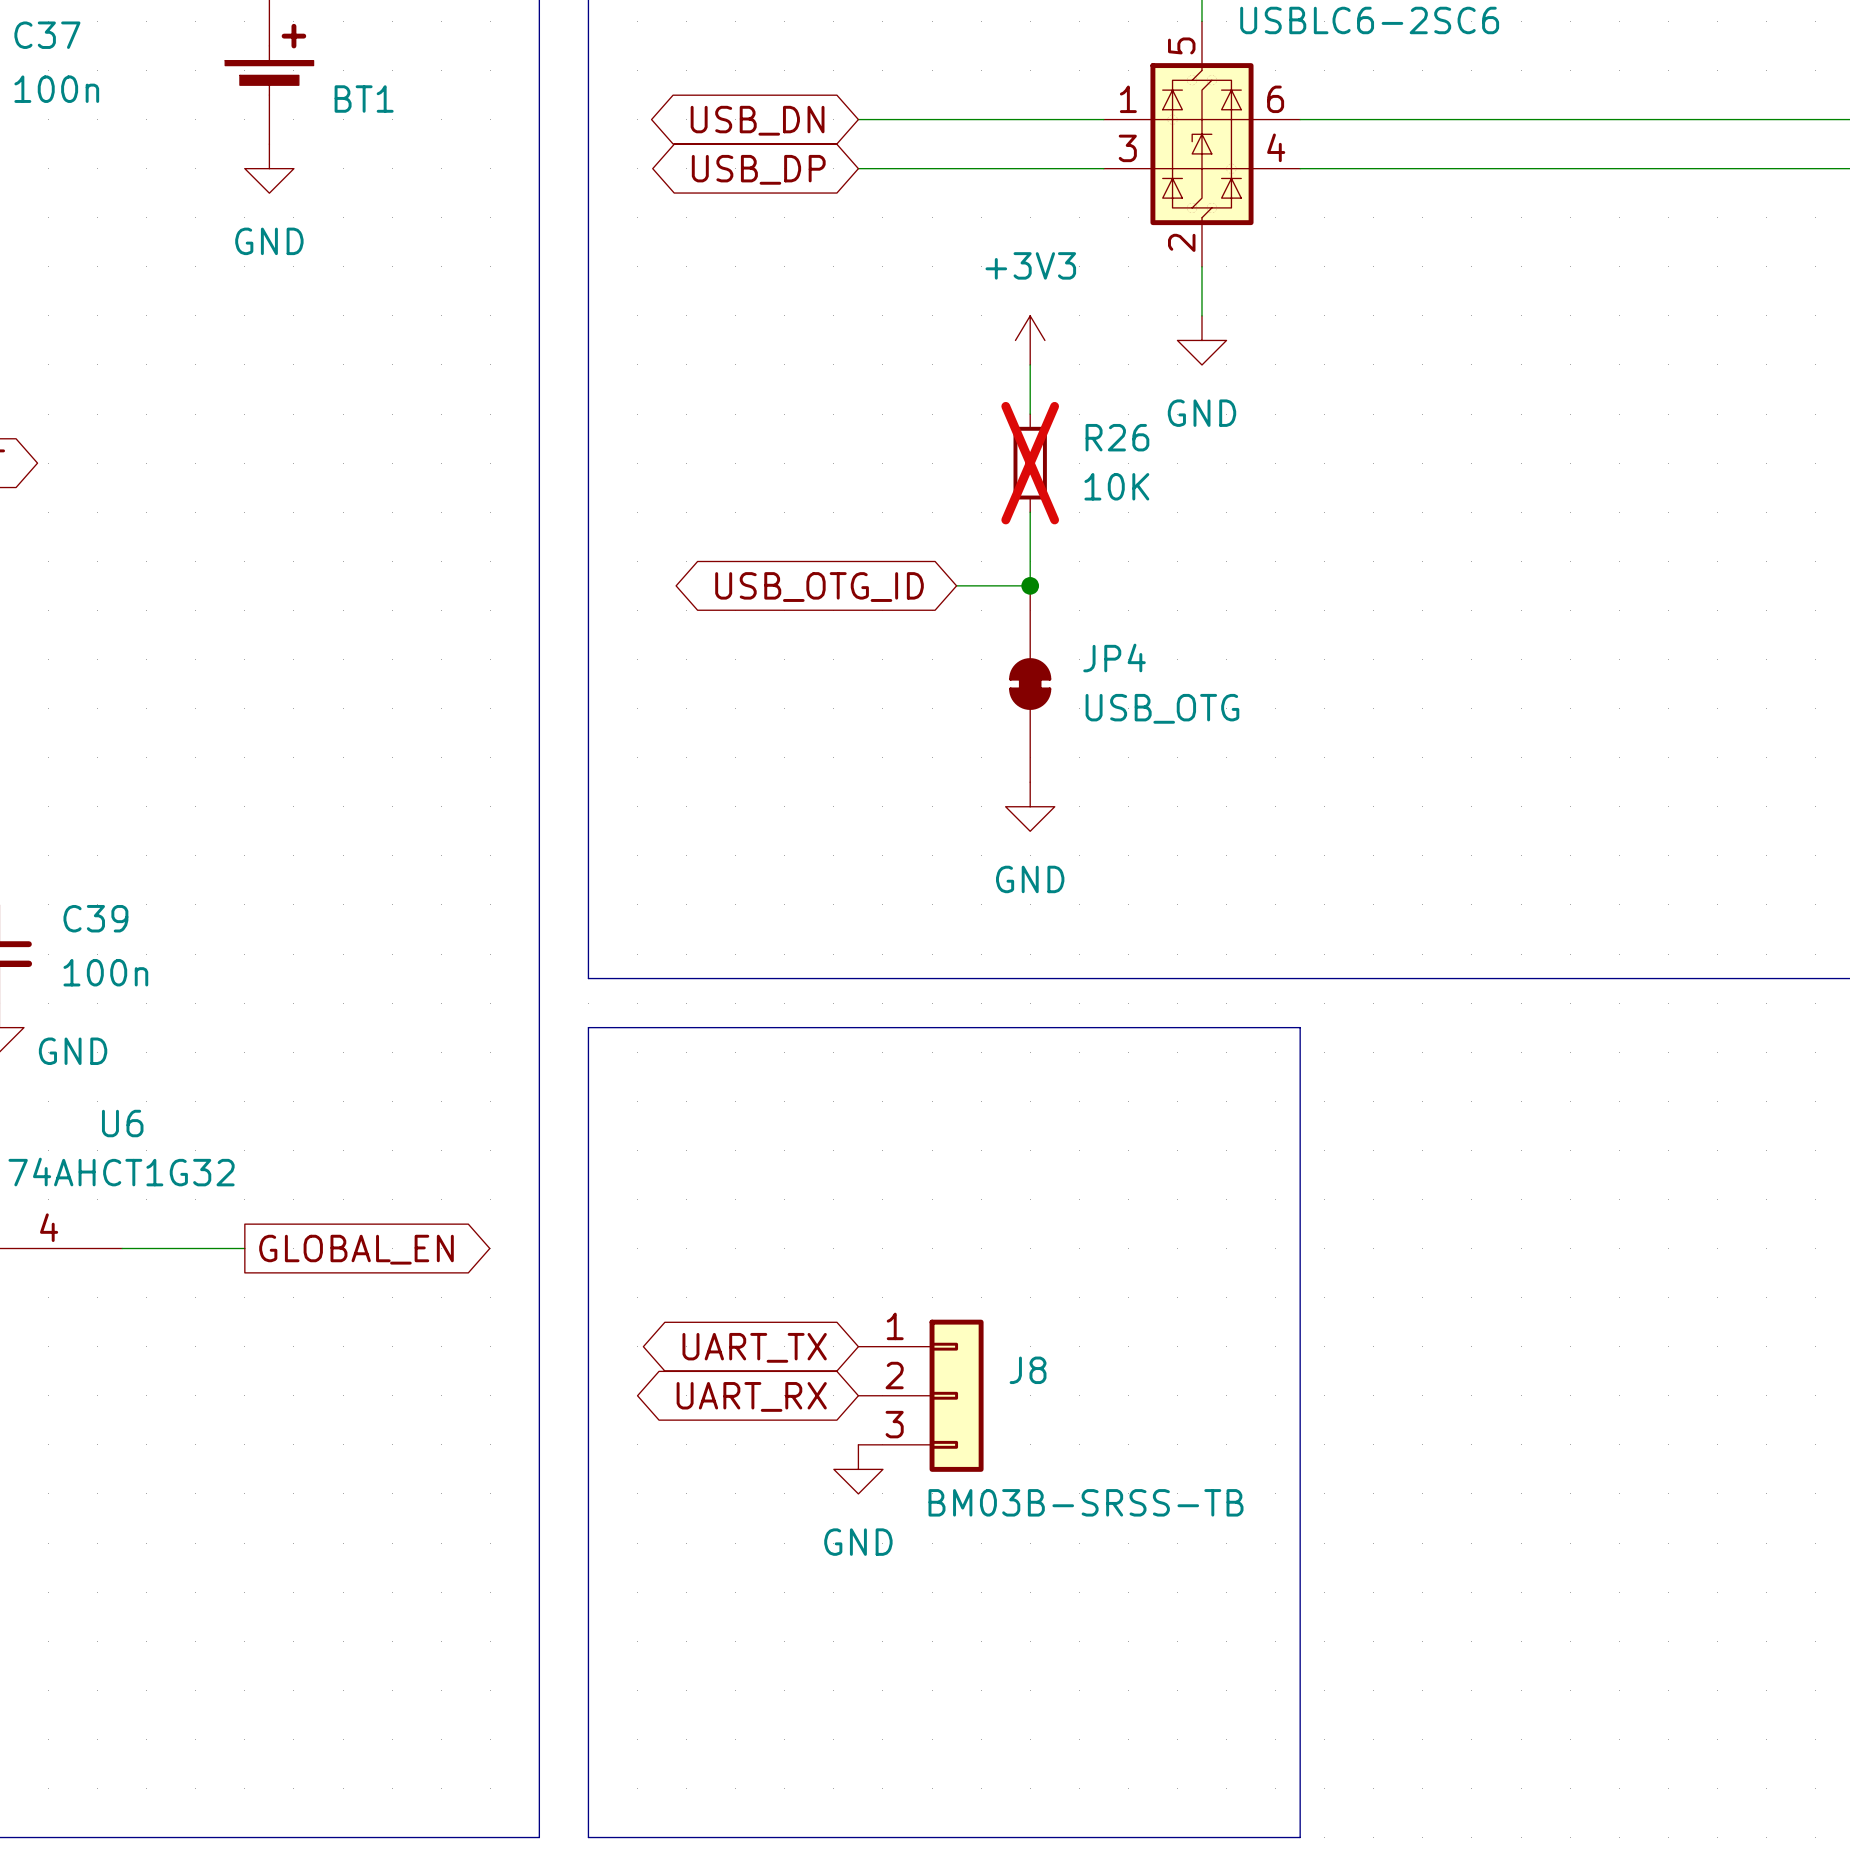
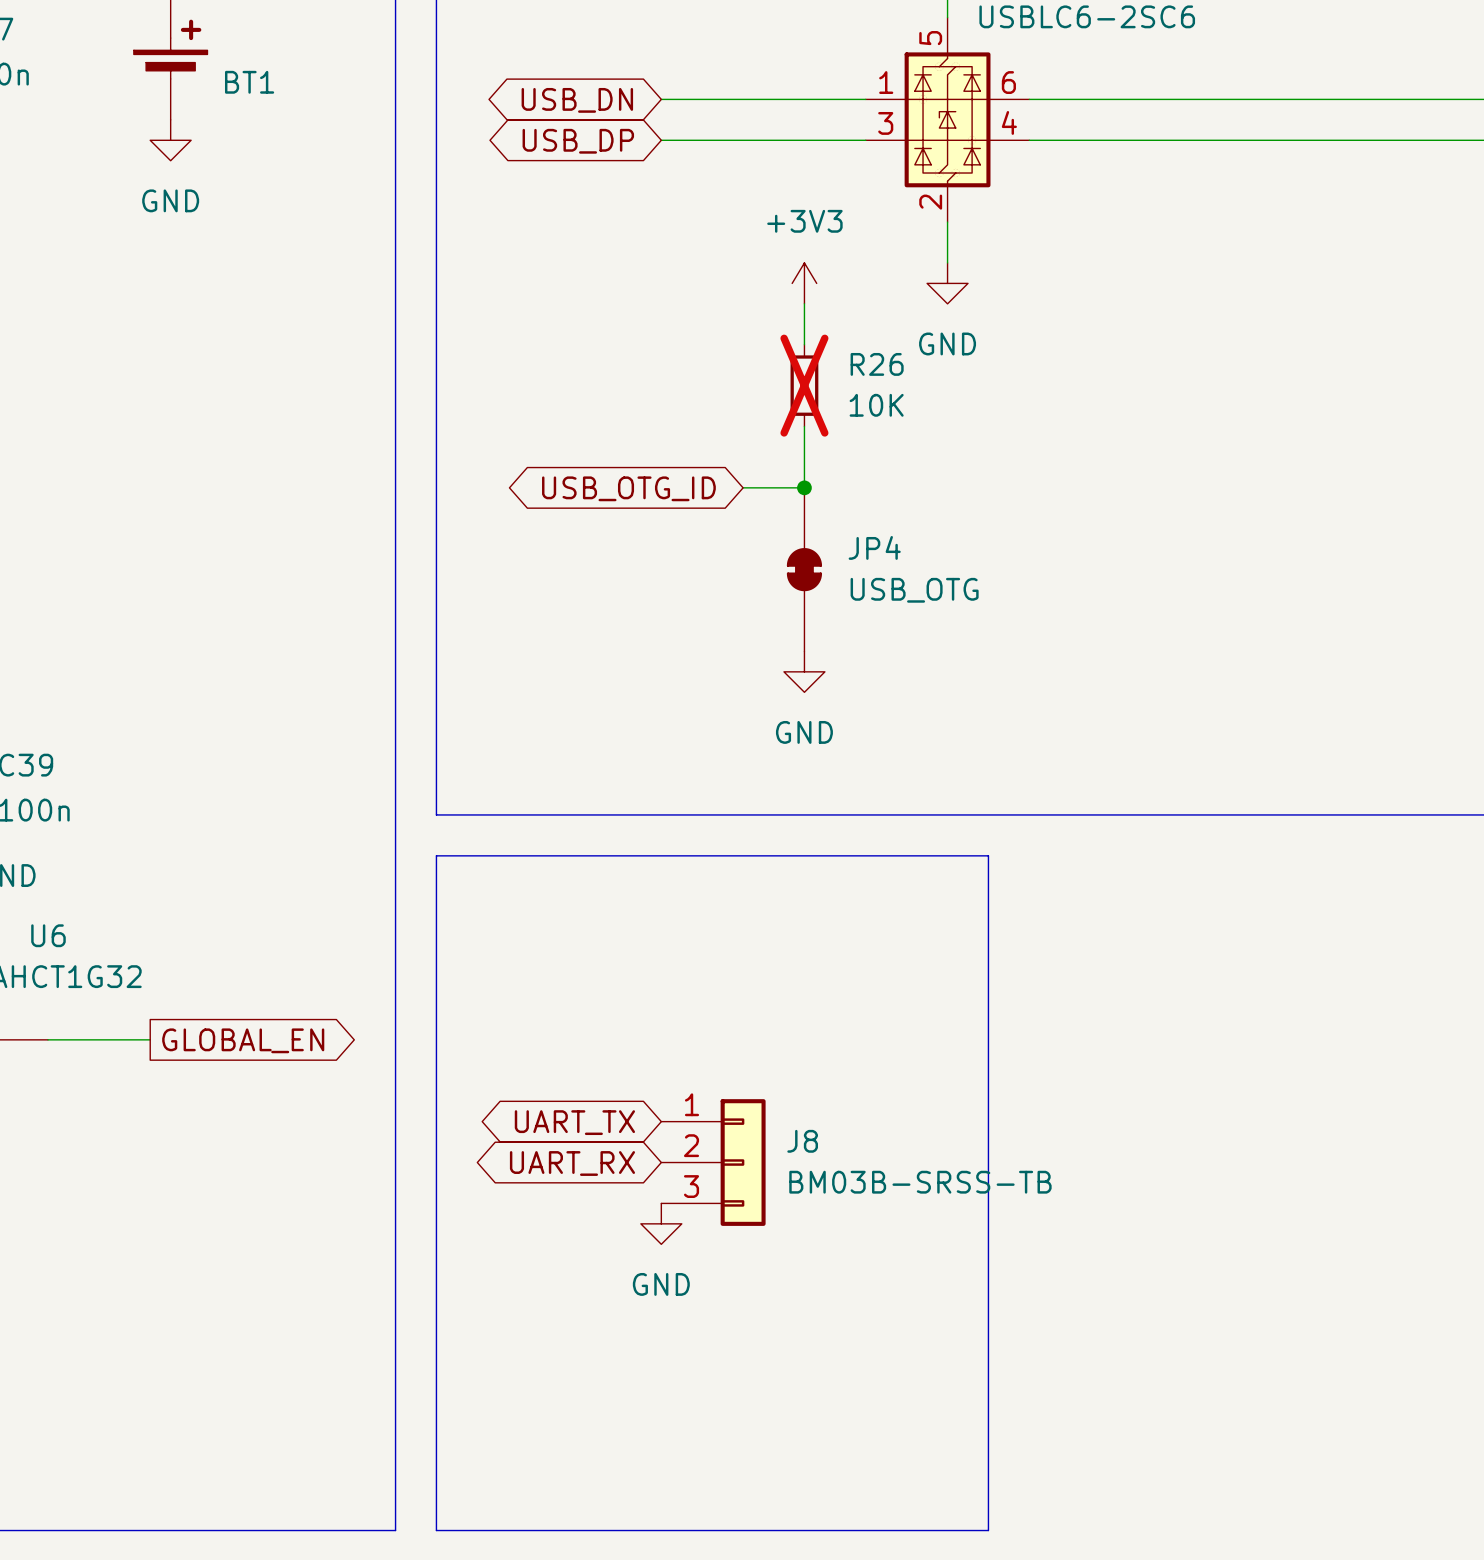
line: (1251, 1027) (1300, 1027) (1300, 1837) (1251, 1837) -> (988, 855) (988, 1530)
J8 value position: BM03B-SRSS-TB (1086, 1502) -> BM03B-SRSS-TB (920, 1182)

